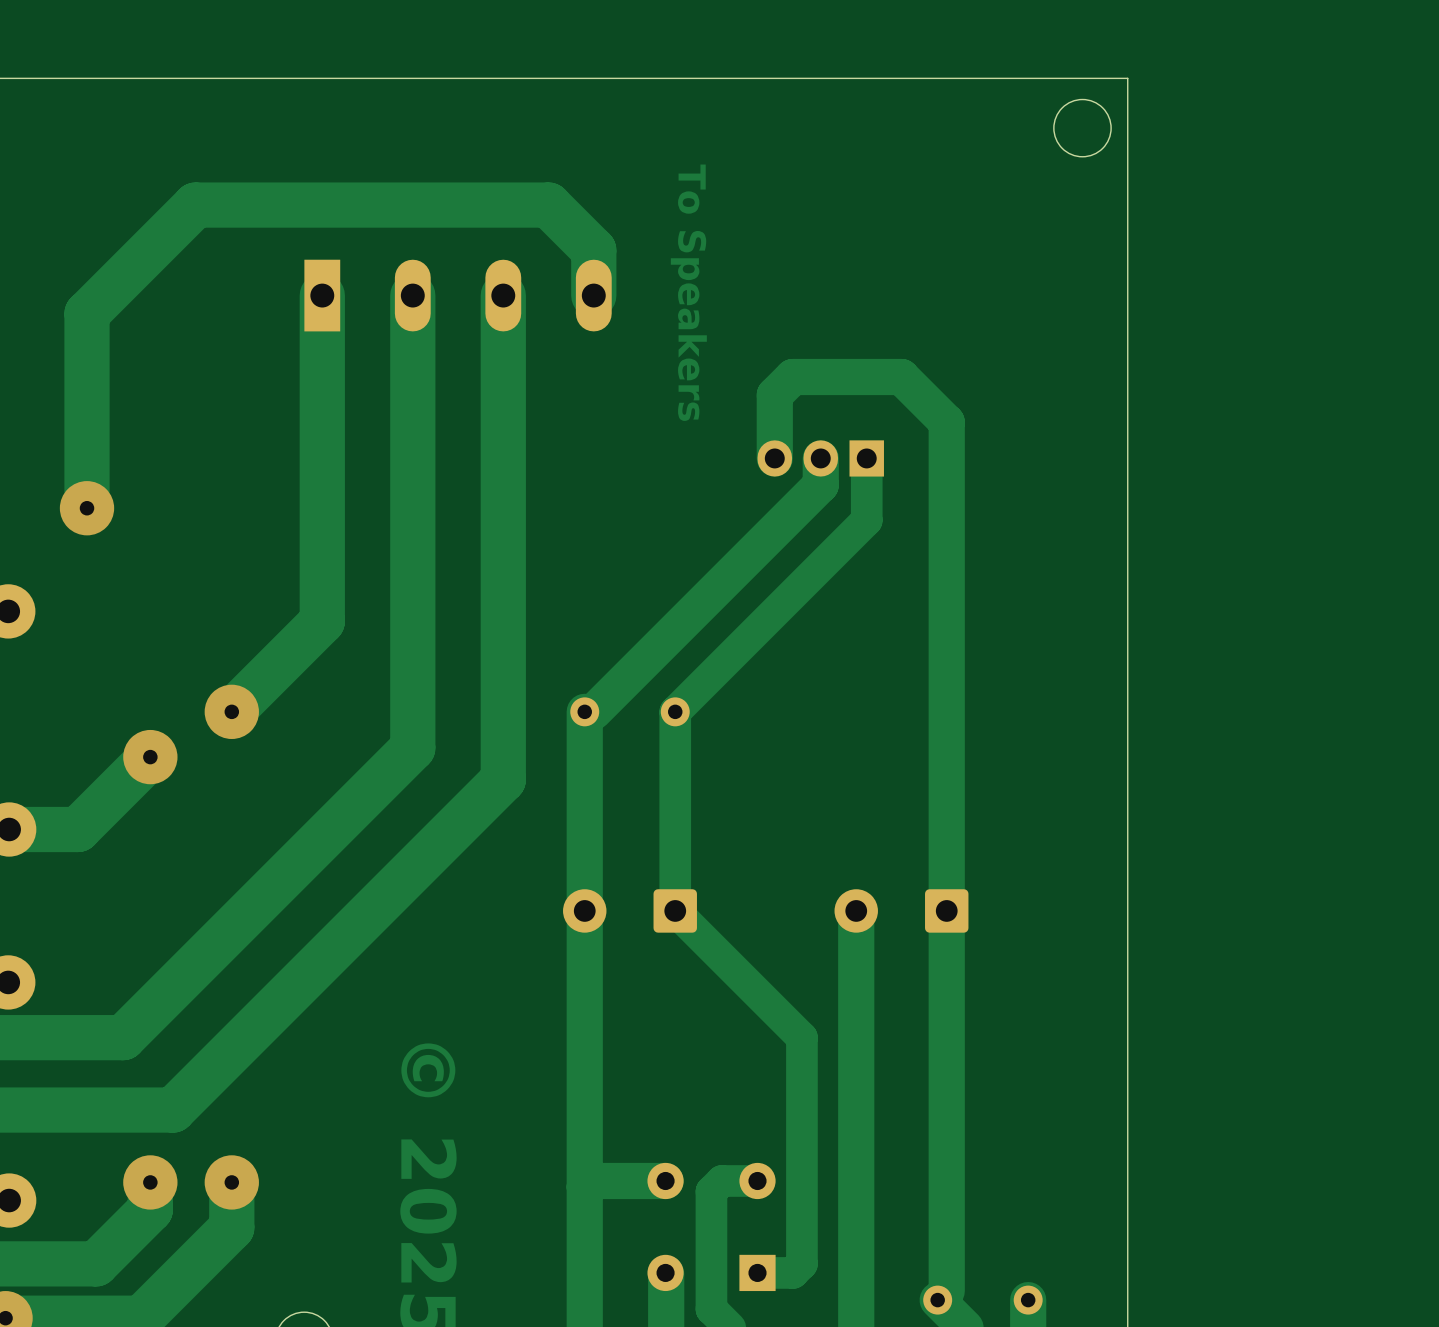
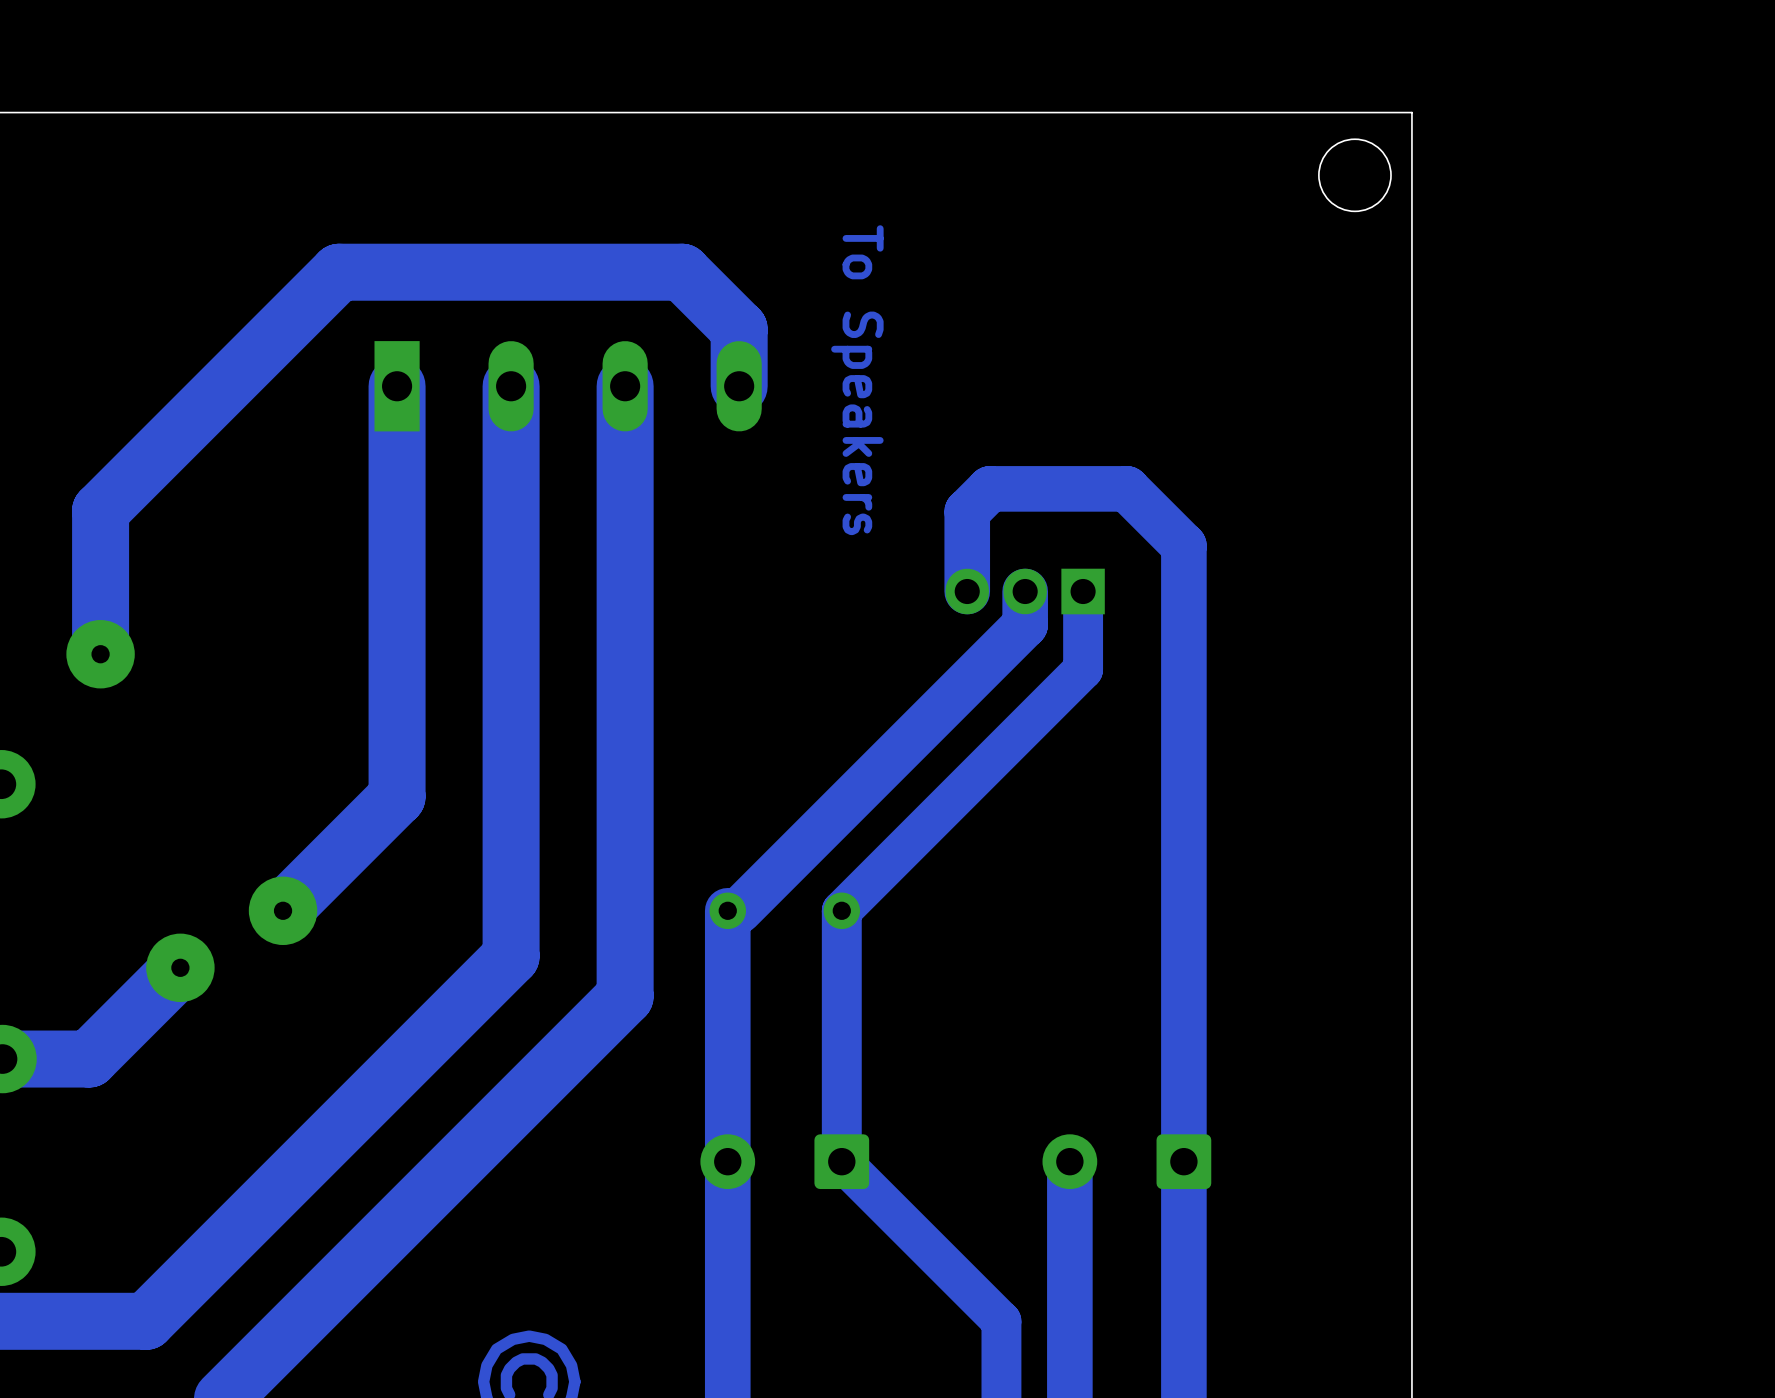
track: (276, 205) (195, 205) (87, 313) (87, 394) -> (339, 272) (100, 510)

